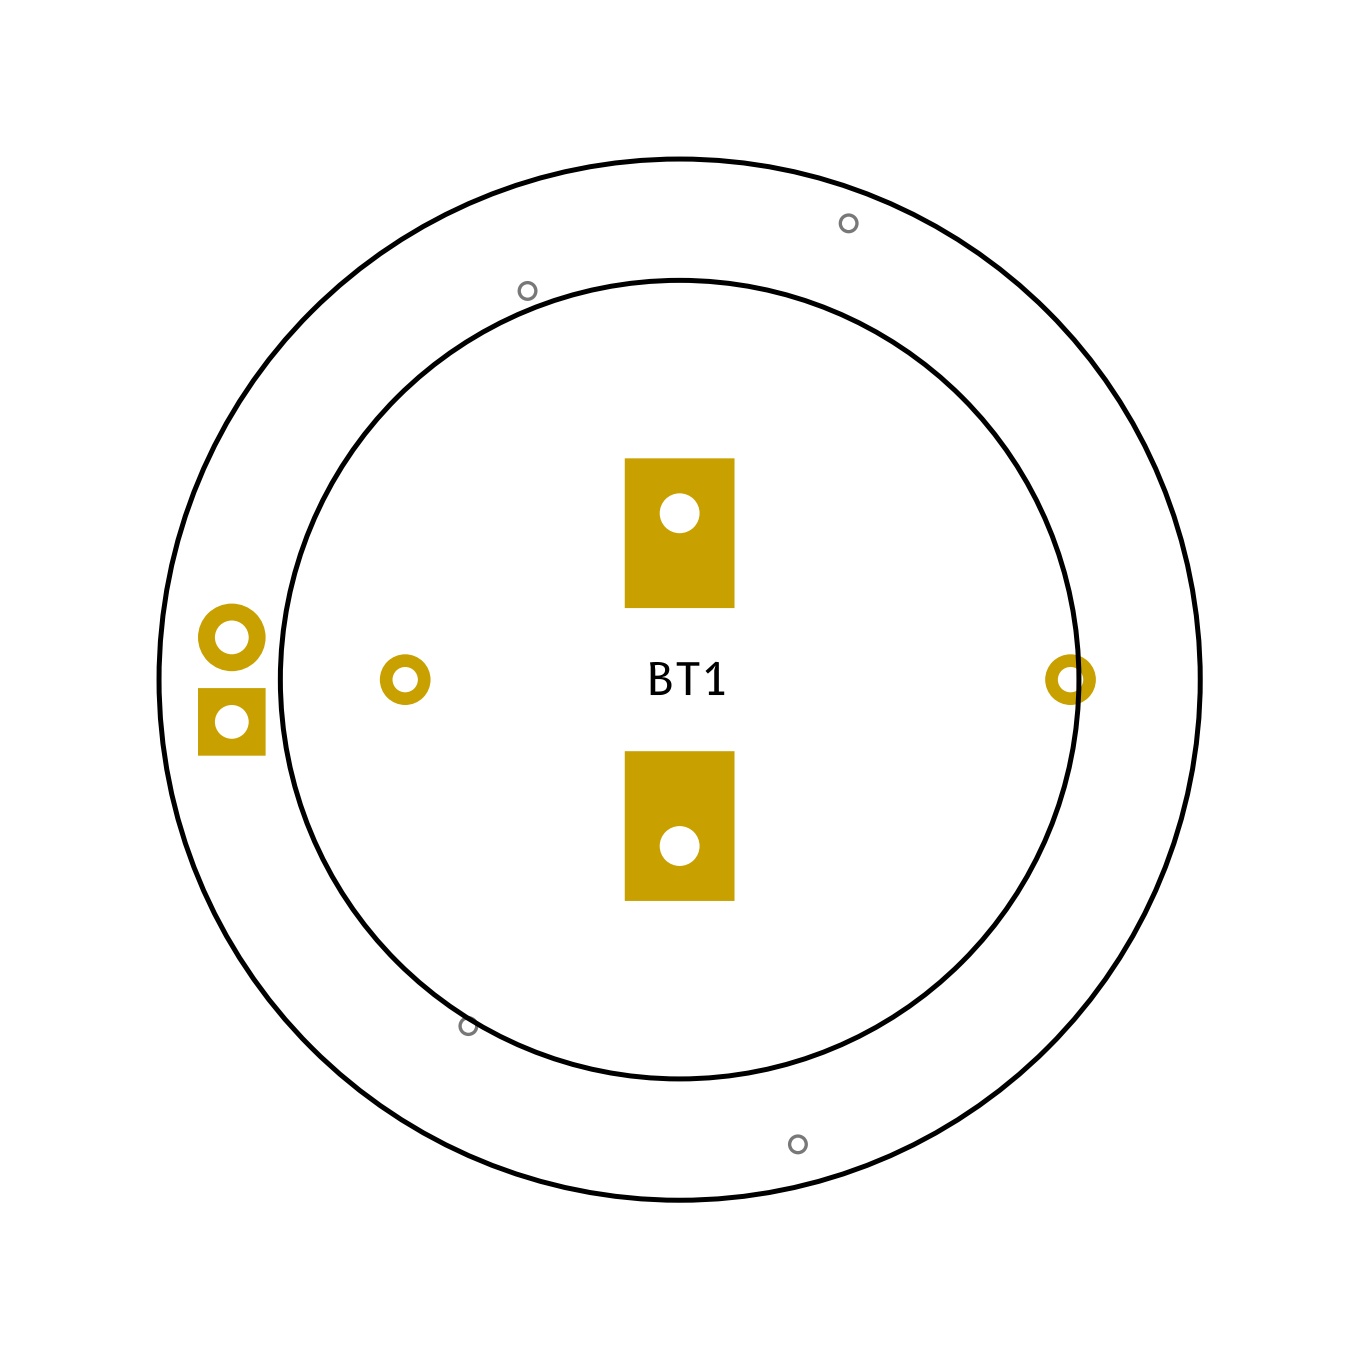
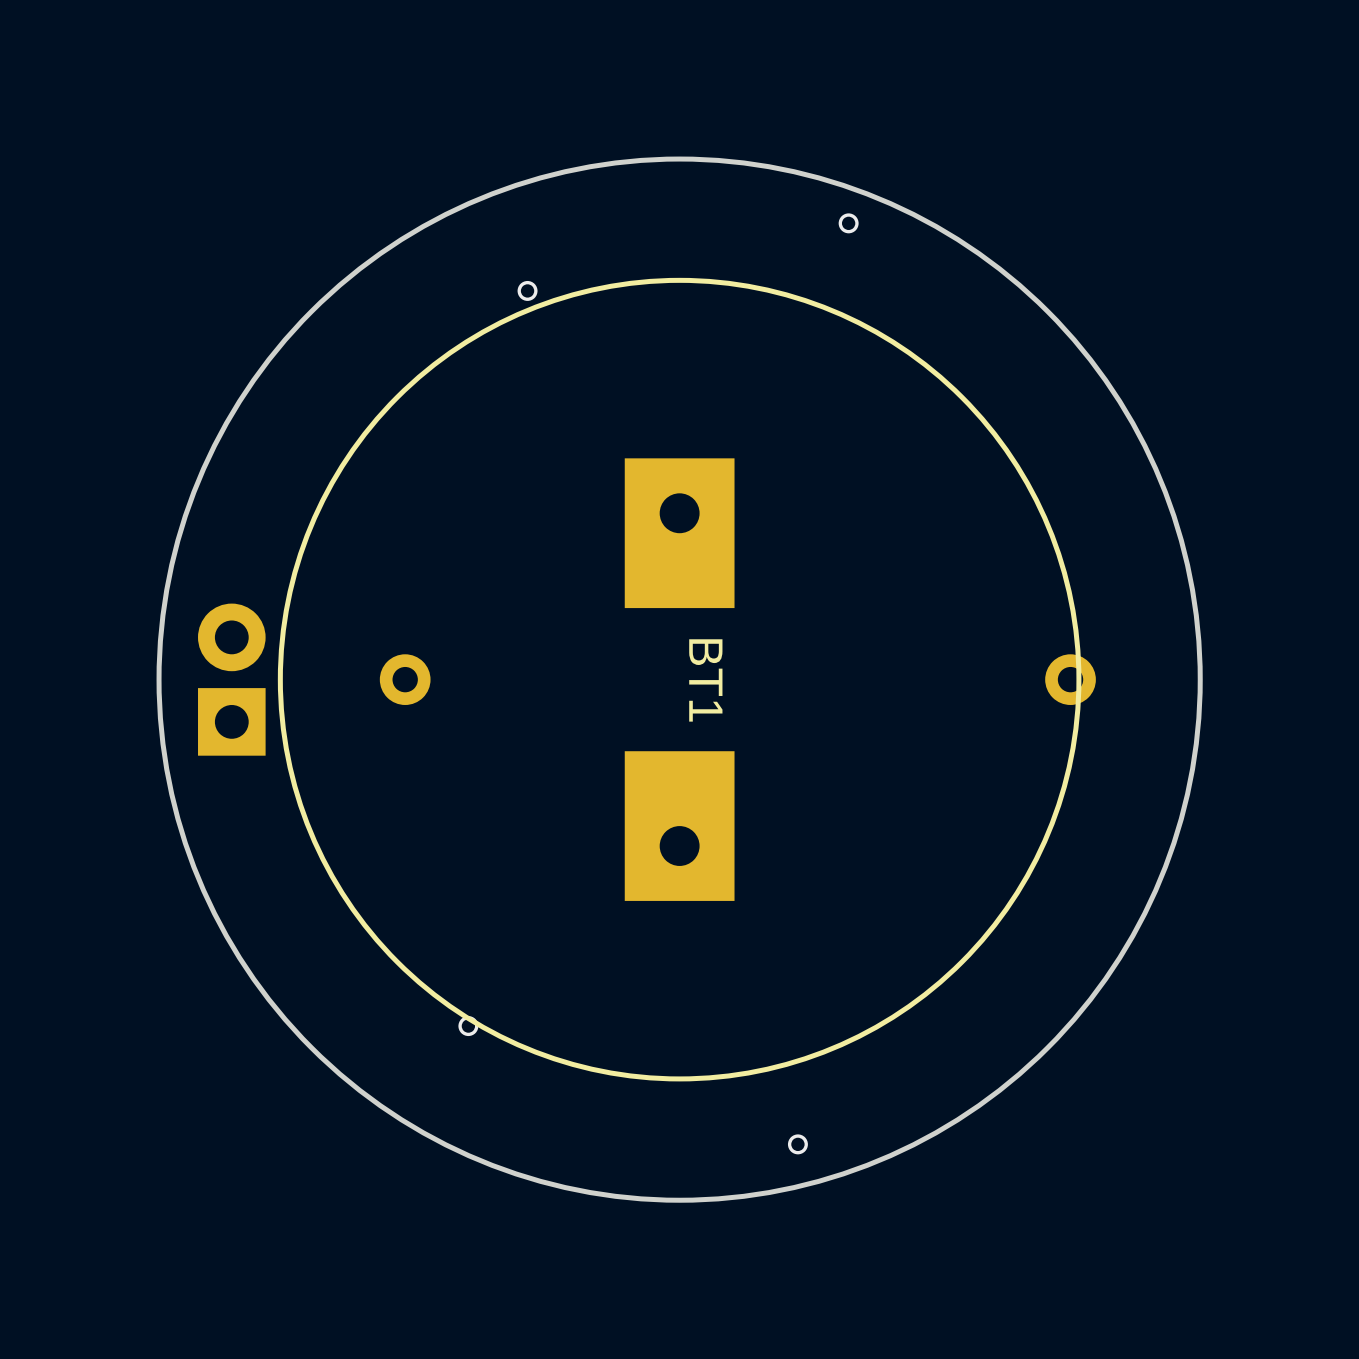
BT1 name rotation: 0° (687, 678) -> 90° clockwise (705, 680)

